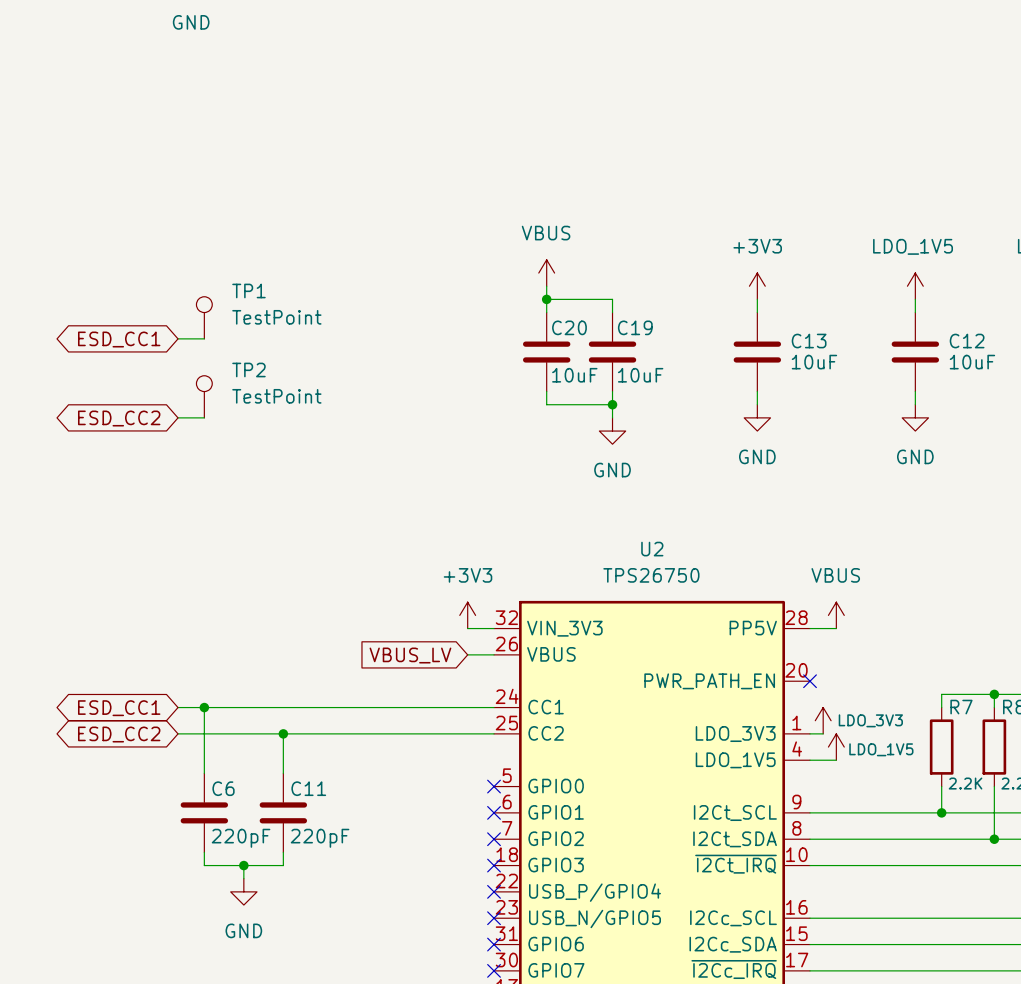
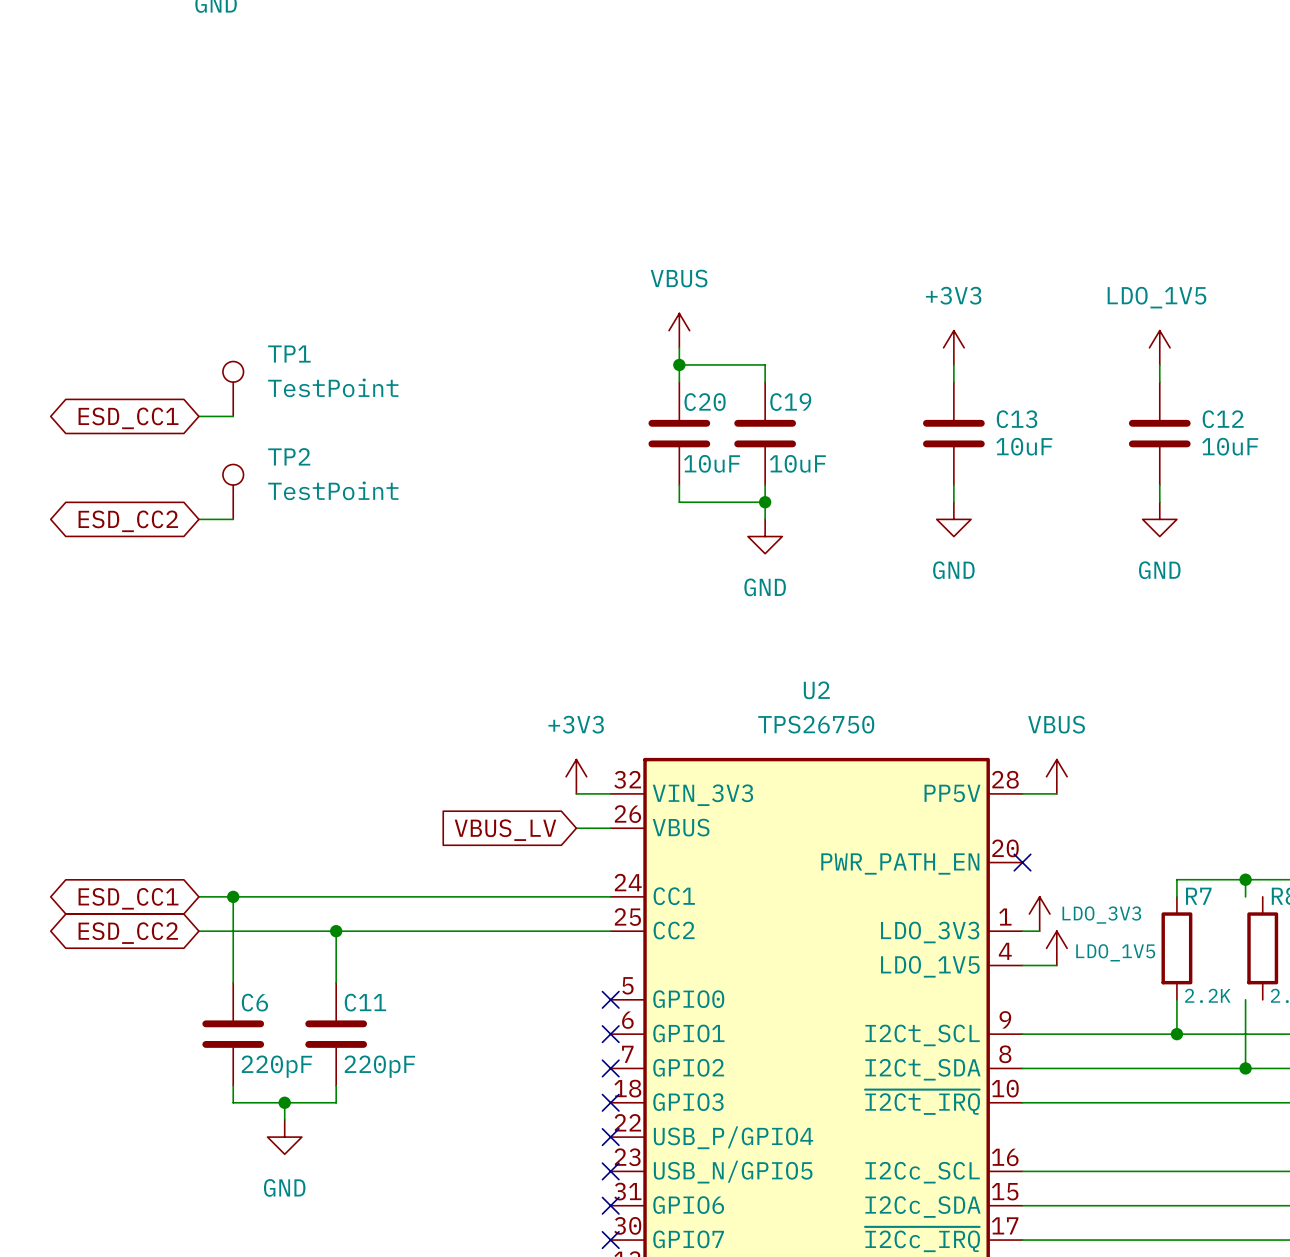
wire: (941, 694) (941, 707) -> (1194, 879) (1176, 879) (1176, 896)
wire: (994, 694) (994, 707) -> (1245, 879) (1245, 896)
junction position: (994, 694) -> (1245, 879)
R7 position: (941, 747) -> (1176, 948)
wire: (941, 786) (941, 812) -> (1176, 999) (1176, 1034)
wire: (994, 786) (994, 839) -> (1245, 999) (1245, 1068)
junction position: (941, 812) -> (1176, 1034)
junction position: (994, 839) -> (1245, 1068)

